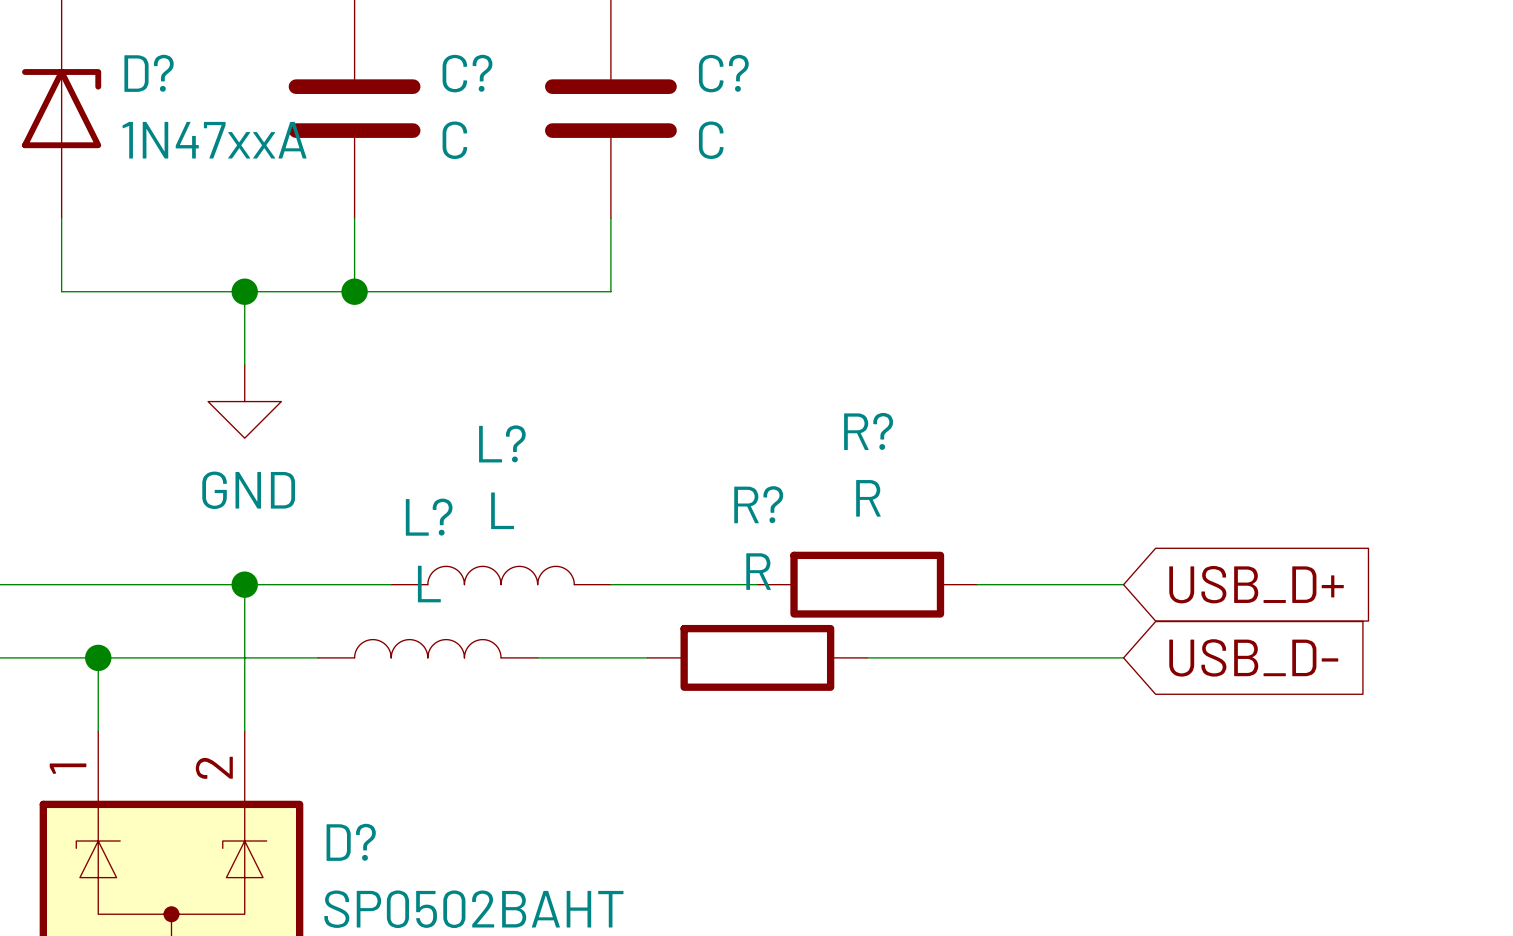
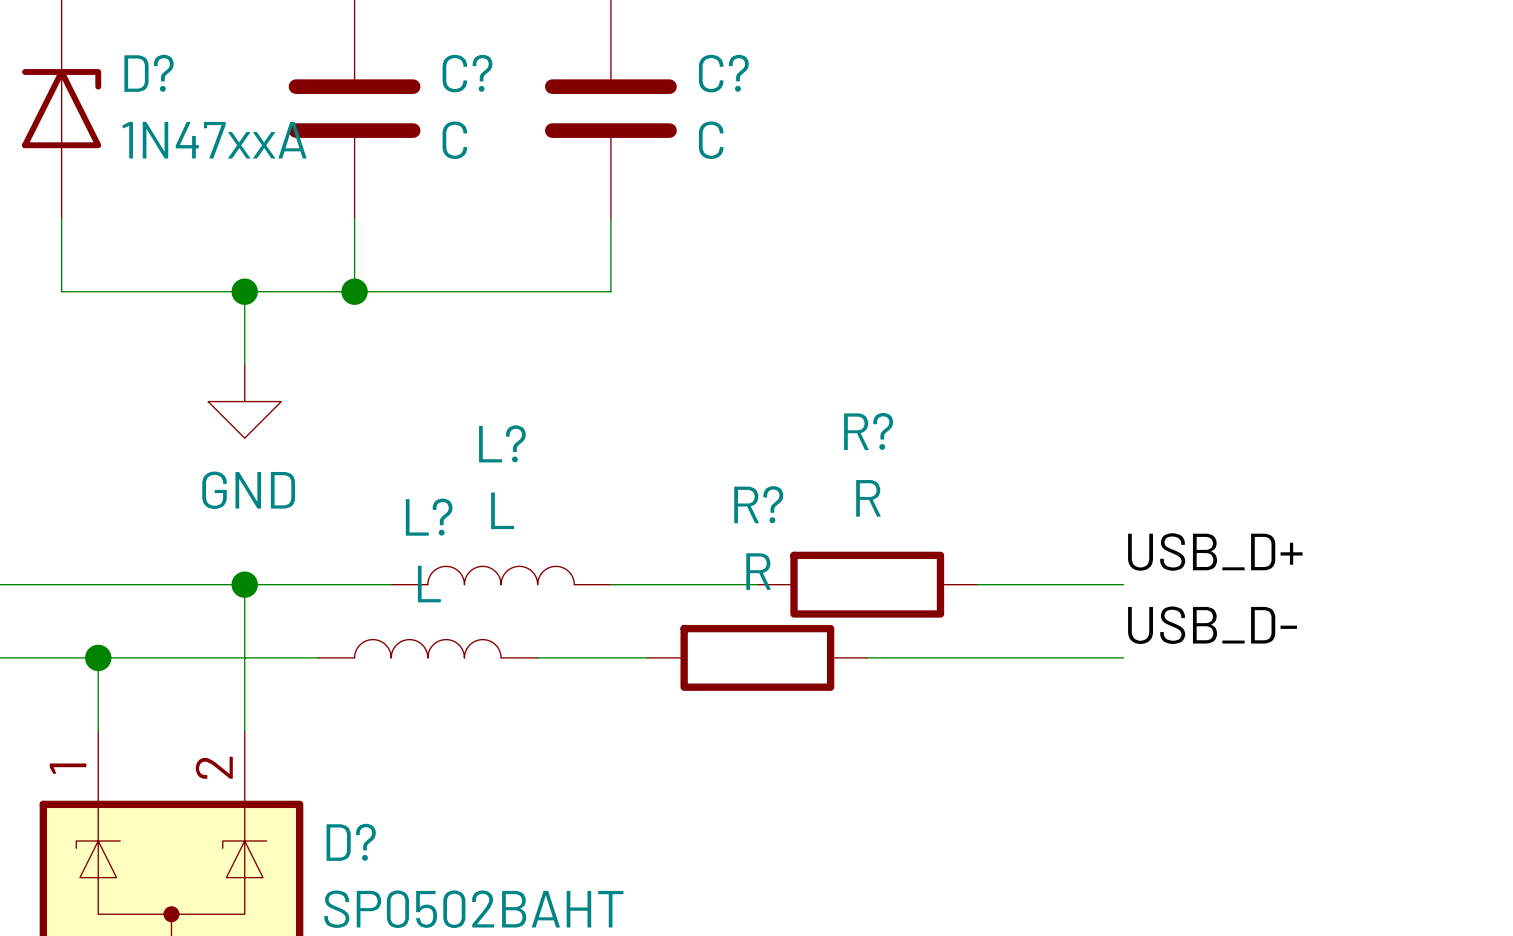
label: none -> USB_D+ (1215, 551)
global label: USB_D+ (1256, 584) -> none
label: none -> USB_D- (1212, 625)
global label: USB_D- (1253, 657) -> none

